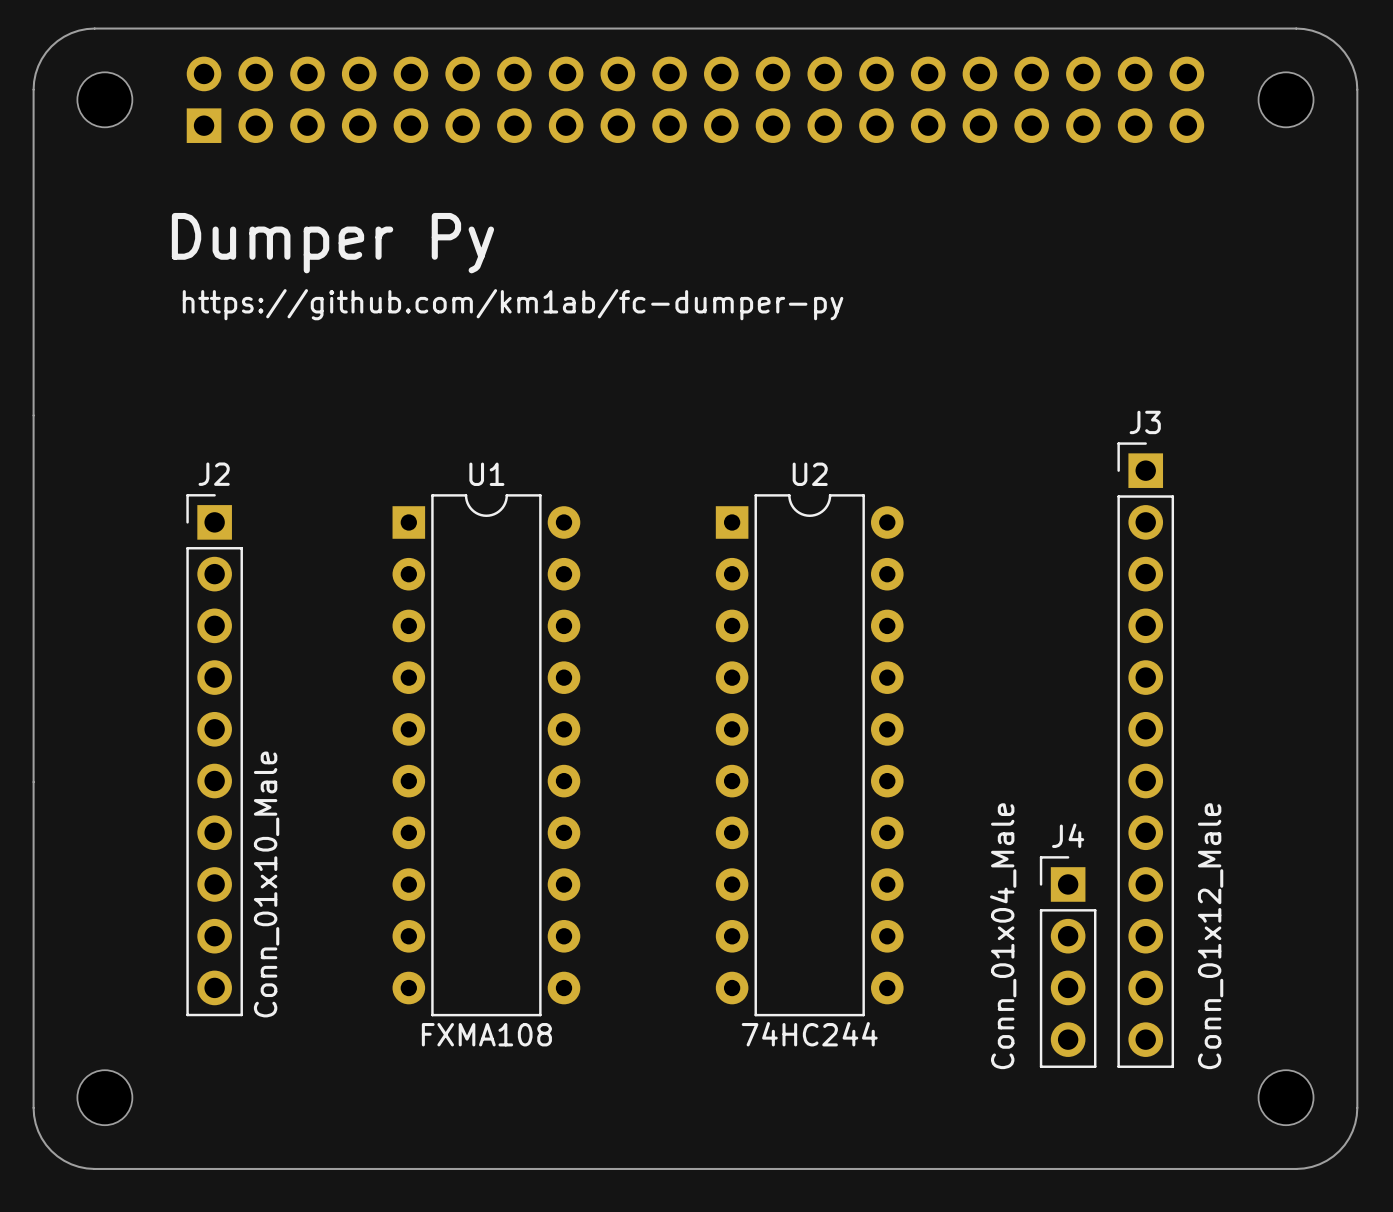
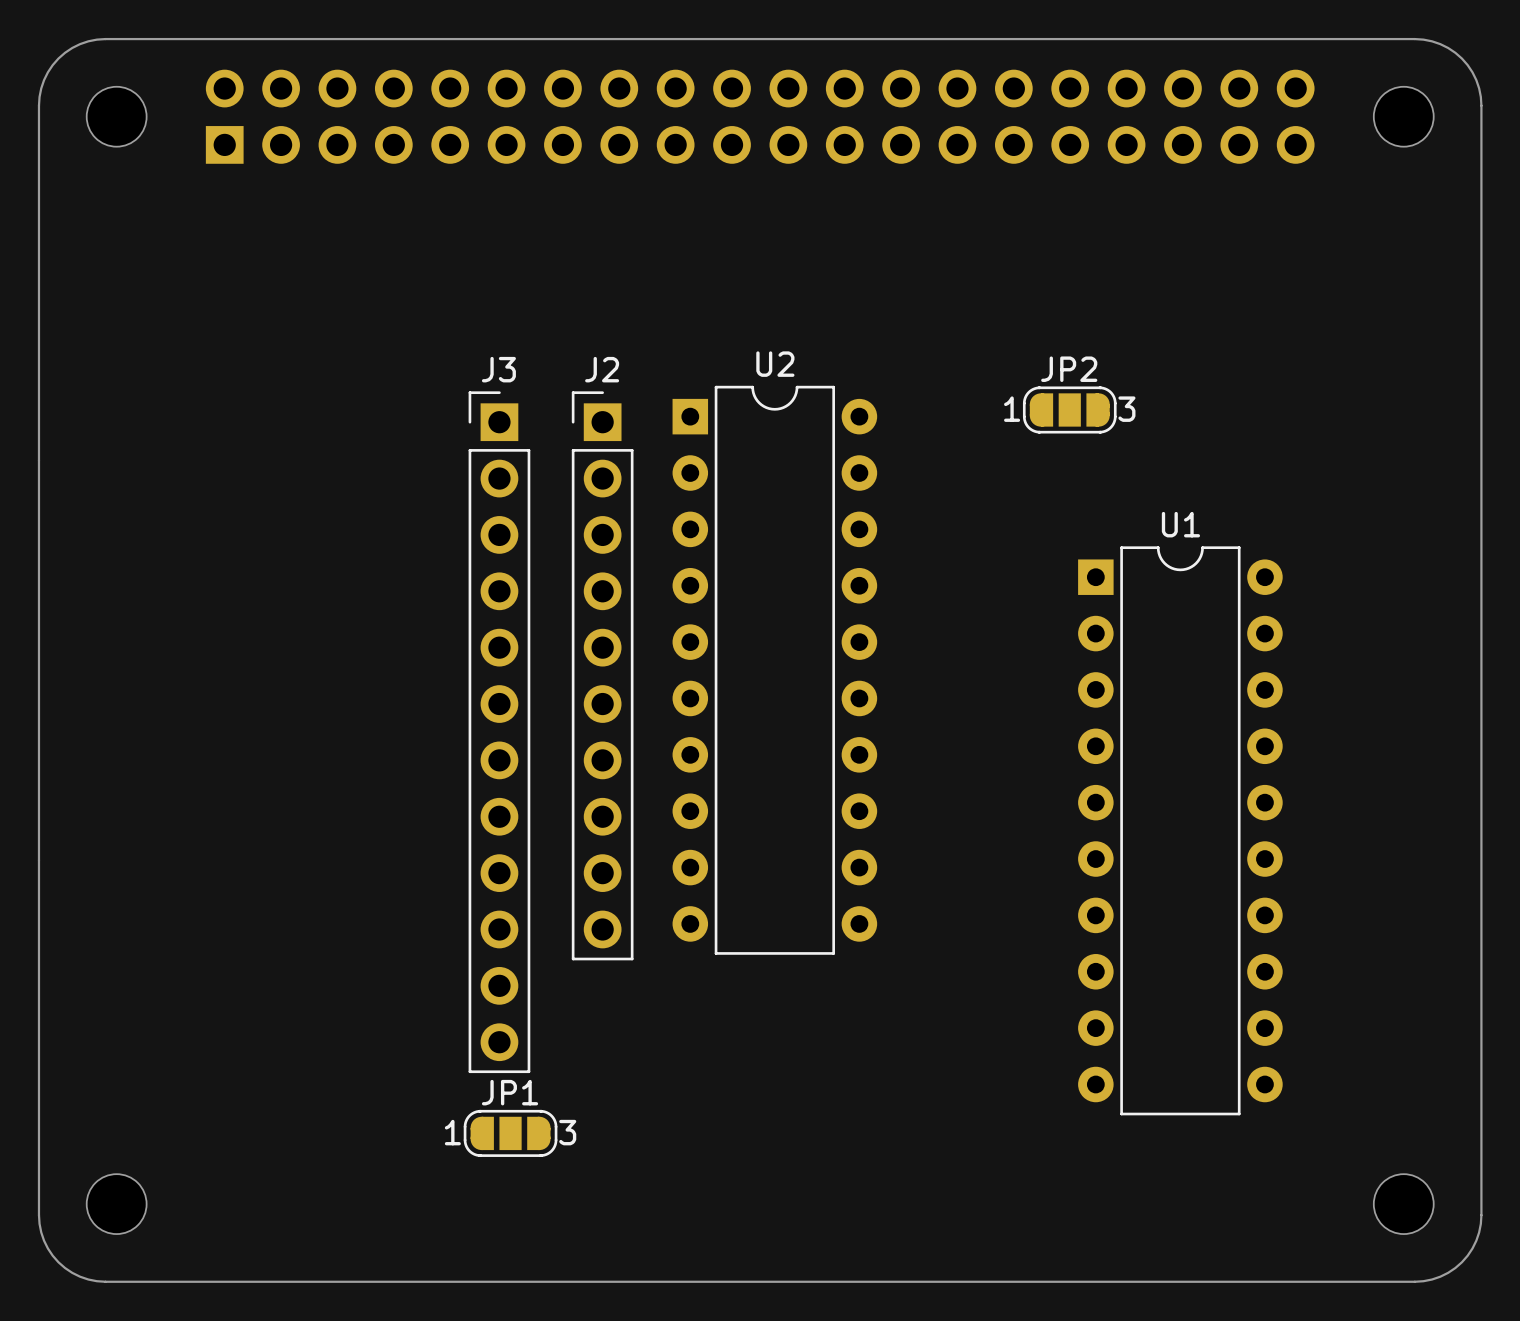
text: Dumper Py (332, 243) -> none
text: https://github.com/km1ab/fc-dumper-py (513, 304) -> none
JP2: none -> (1069, 409)
J2 position: (214, 755) -> (602, 675)
U1 position: (486, 755) -> (1180, 830)
U2 position: (809, 755) -> (774, 670)
J3 position: (1145, 755) -> (499, 732)
J2 value: Conn_01x10_Male (266, 884) -> none
J3 value: Conn_01x12_Male (1210, 936) -> none
J4: Conn_01x04_Male (1068, 962) -> none
JP1: none -> (510, 1133)
U1 value: FXMA108 (486, 1034) -> none
U2 value: 74HC244 (809, 1034) -> none

